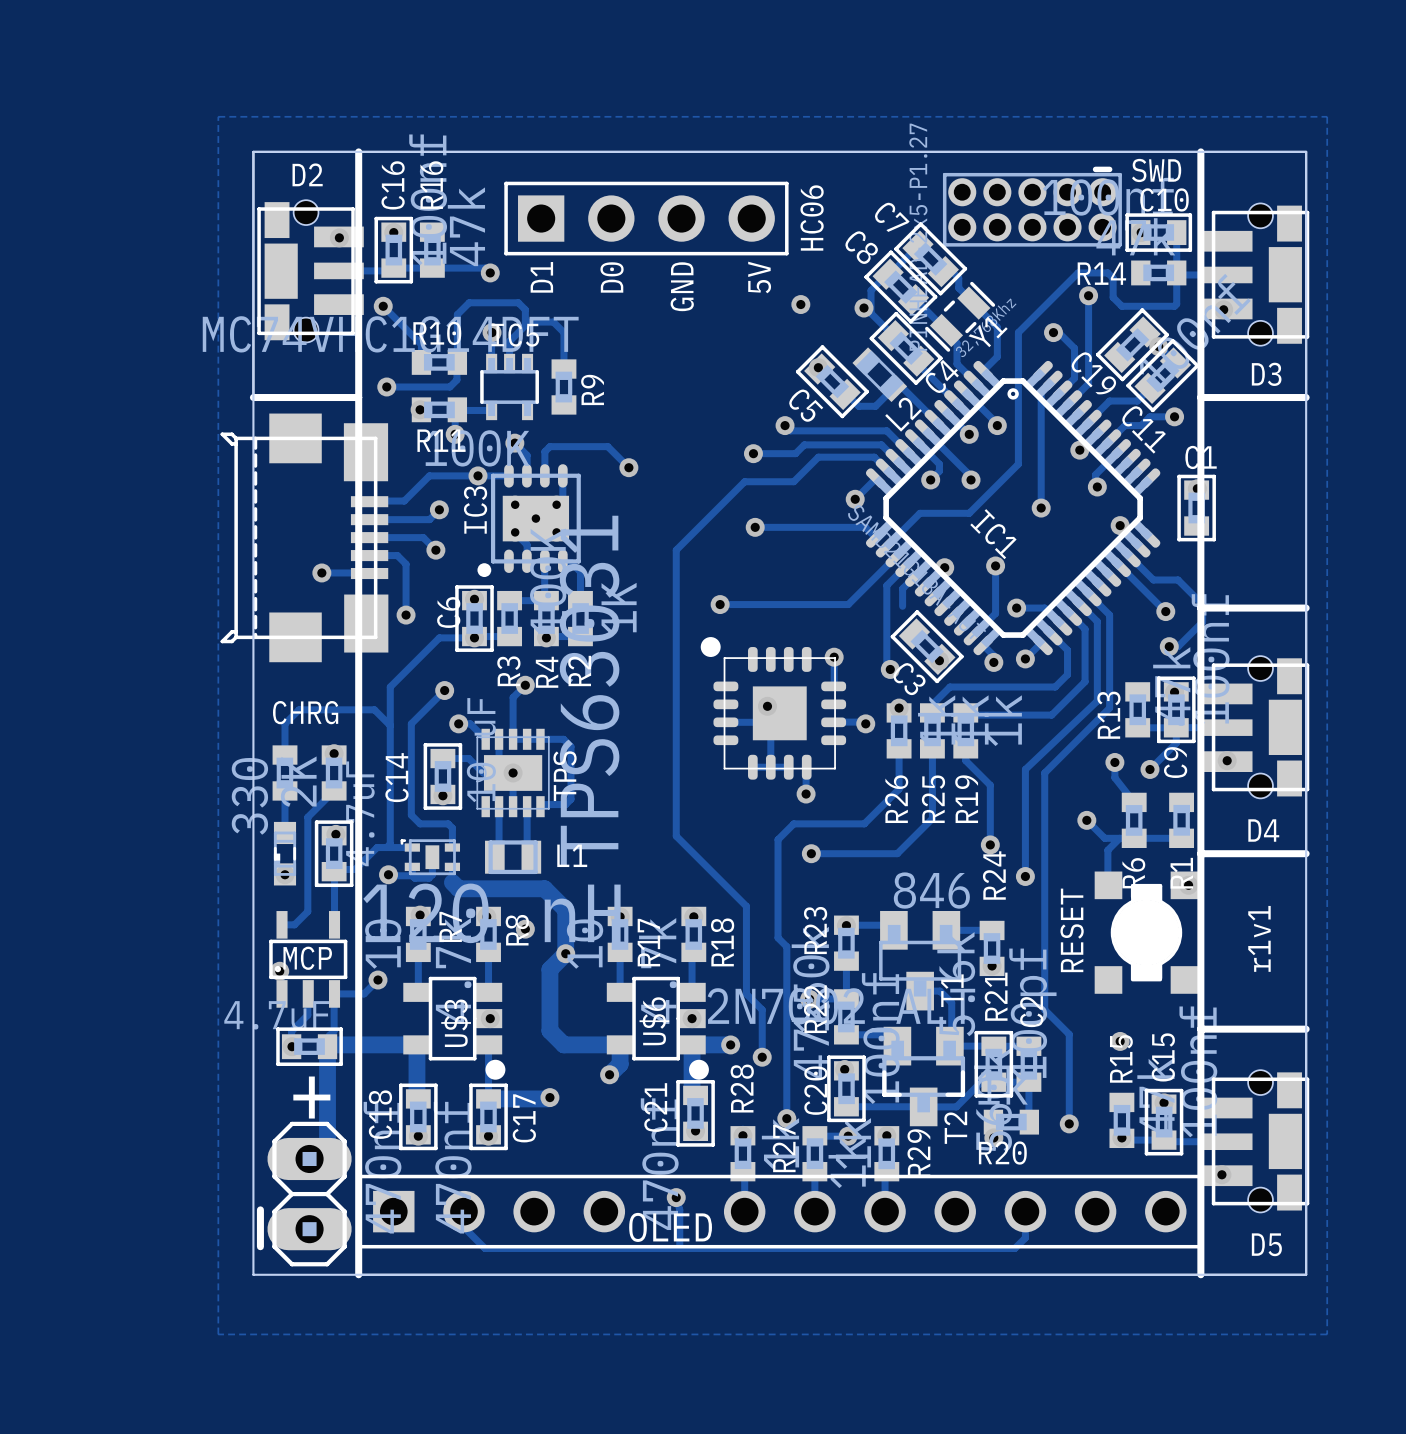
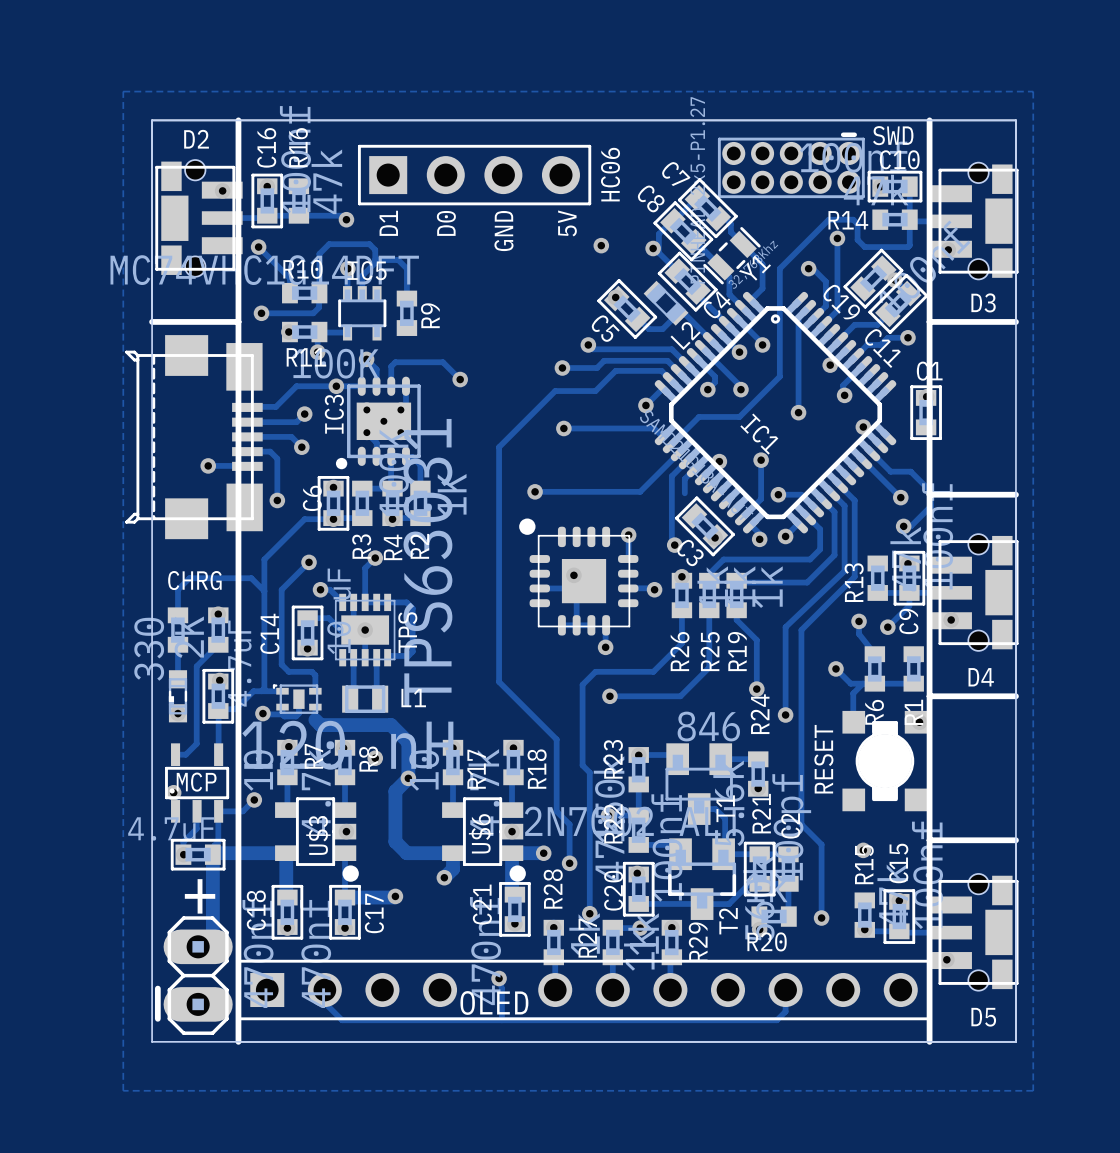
text: r1v1 (1259, 938) -> none

